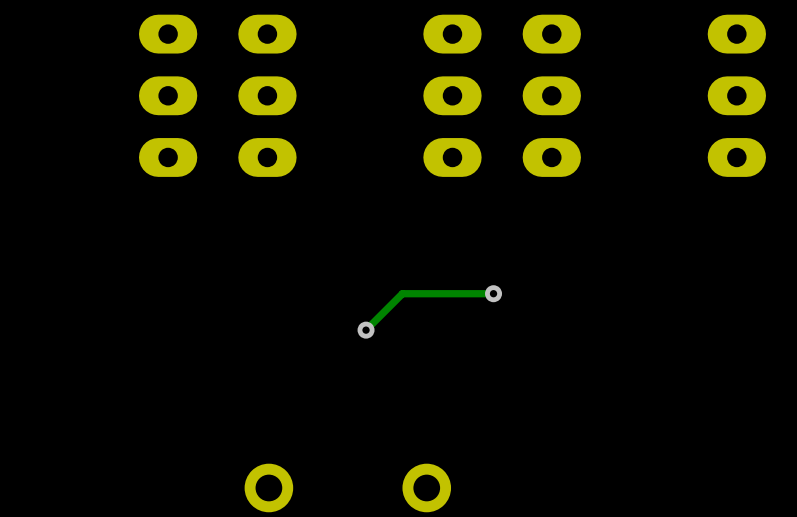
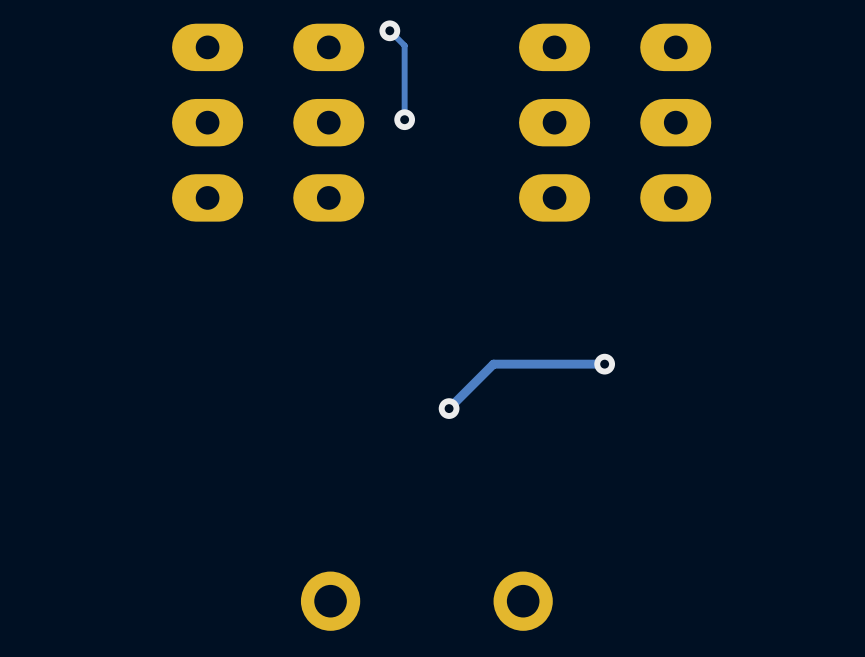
track: none -> (389, 30) (404, 45) (404, 119)
via: none -> (389, 30)
via: none -> (404, 119)

